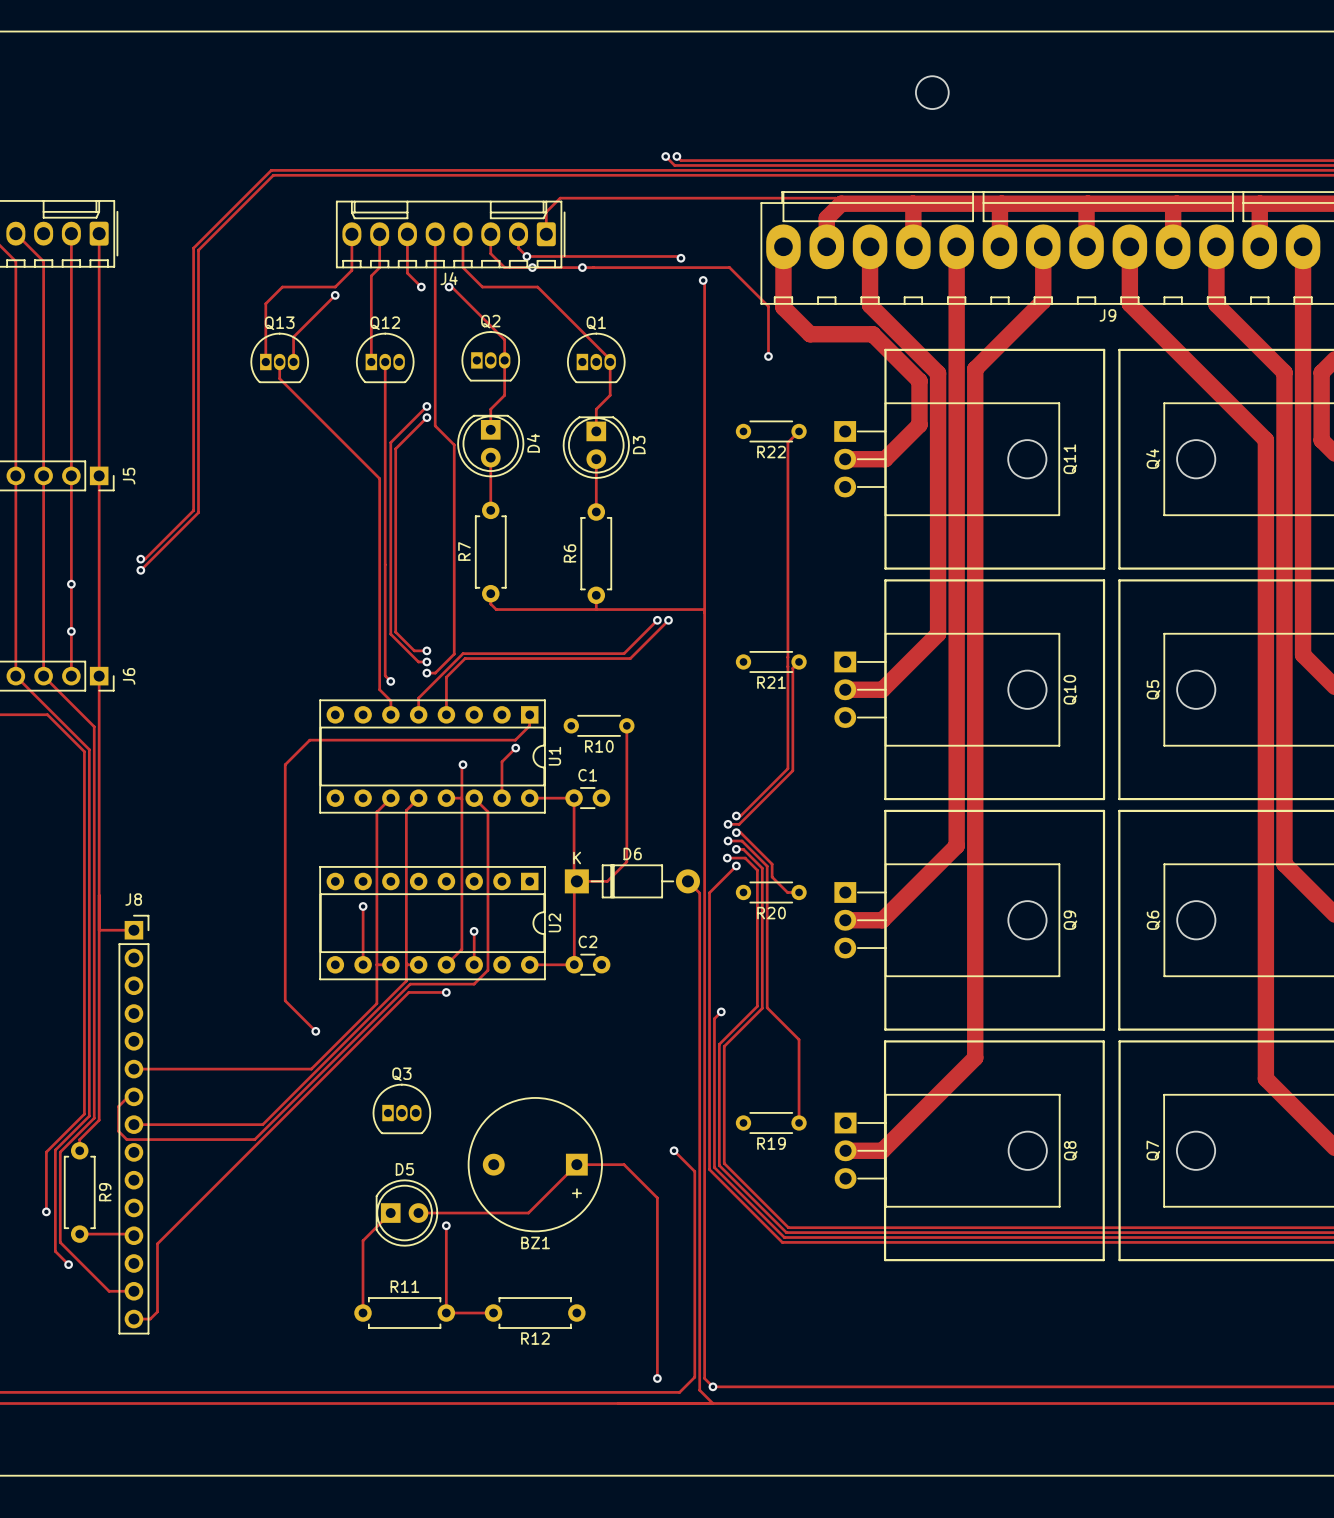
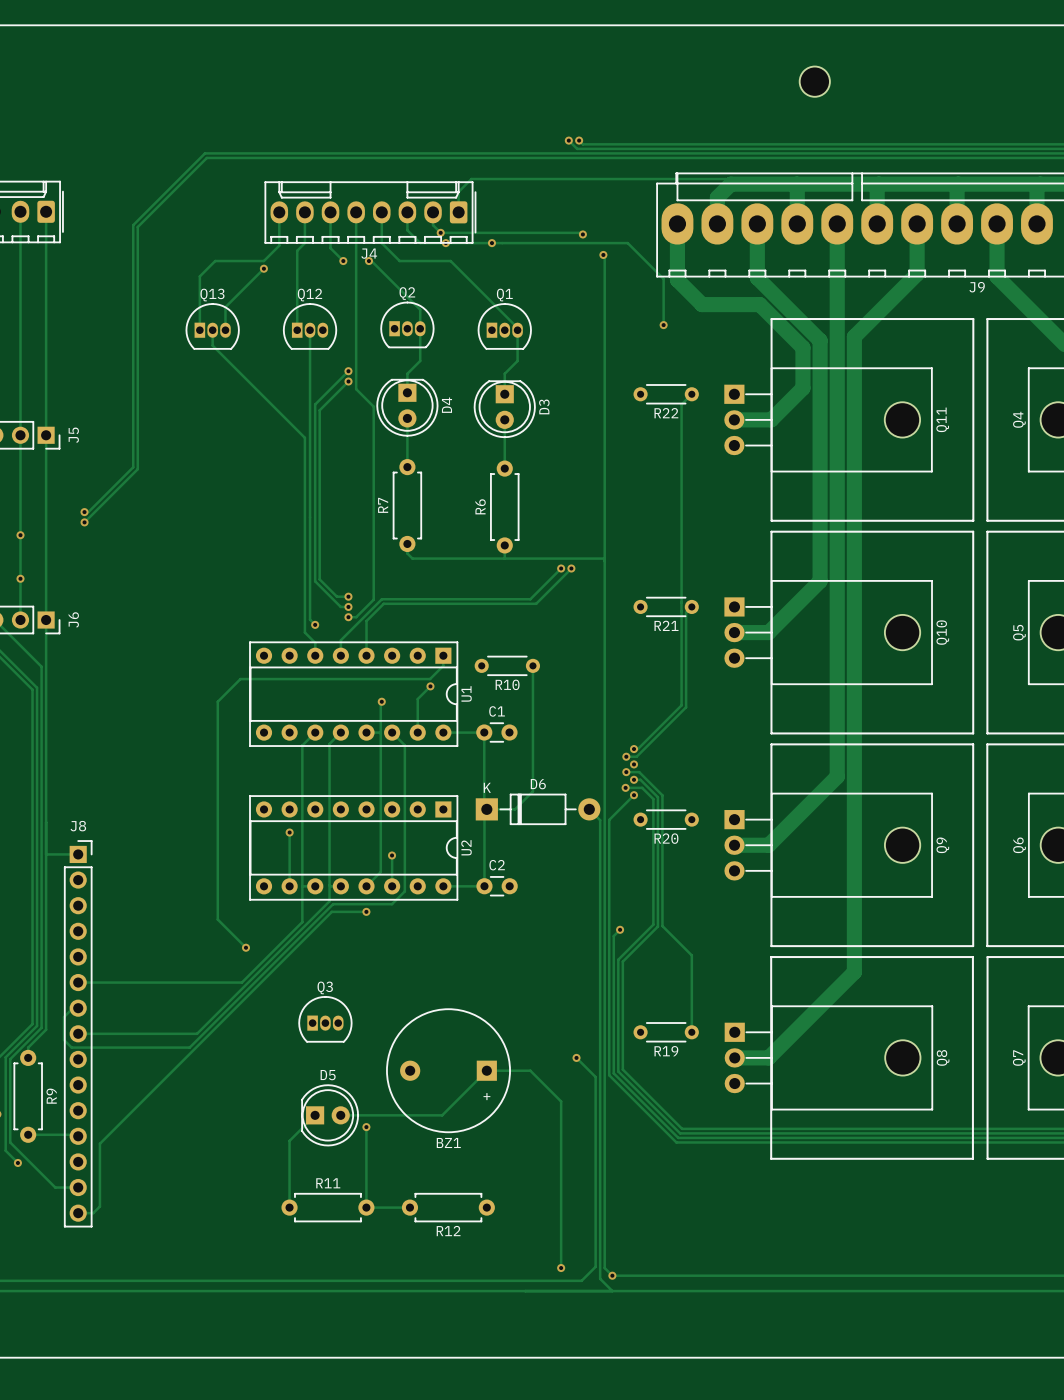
track: (736, 832) (740, 832) (772, 864) (772, 877) (787, 892) (799, 892) -> none

